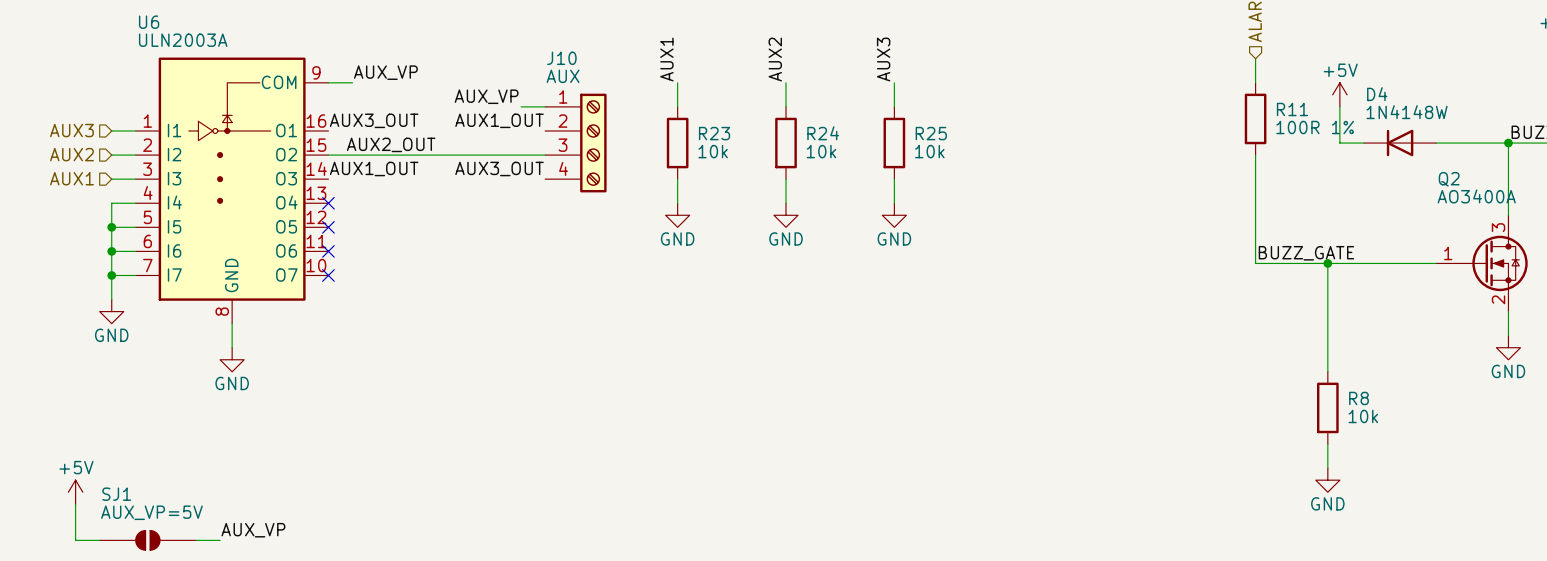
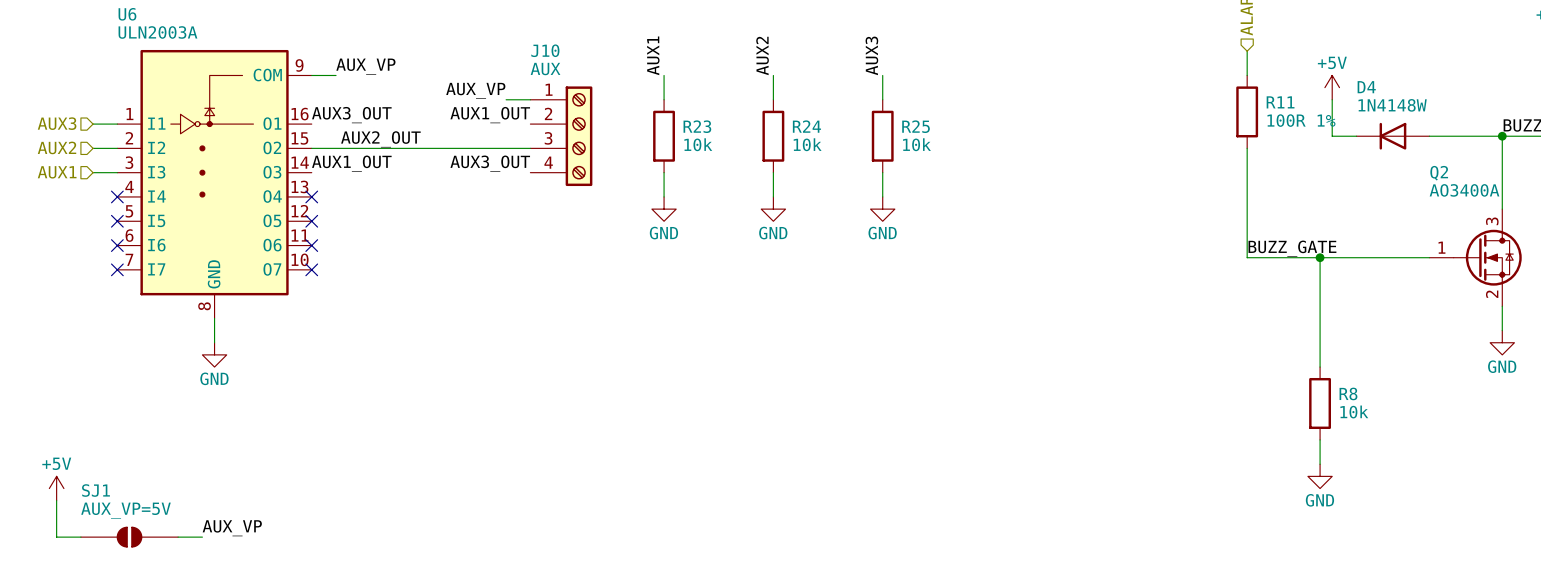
wire: (135, 203) (111, 203) (111, 299) -> none
no-connect mark: none -> (117, 196)
wire: (111, 227) (135, 227) -> none
junction: (111, 227) -> none
no-connect mark: none -> (117, 221)
wire: (111, 251) (135, 251) -> none
junction: (111, 251) -> none
no-connect mark: none -> (117, 245)
wire: (111, 275) (135, 275) -> none
junction: (111, 275) -> none
no-connect mark: none -> (117, 269)
power symbol: GND (111, 311) -> none

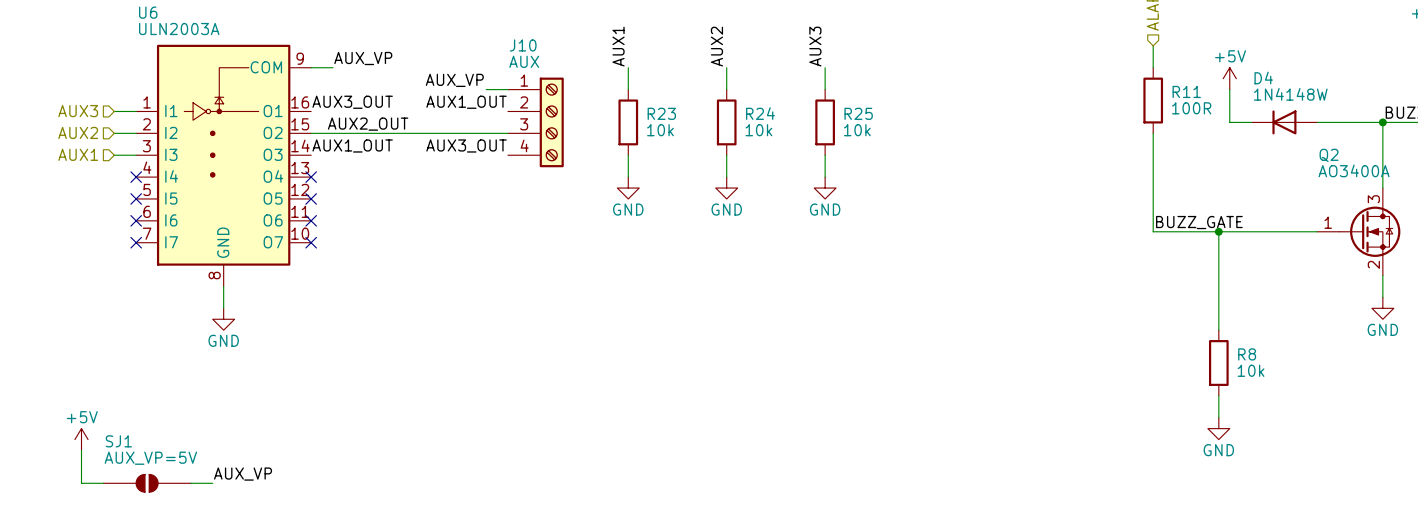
R11 value: 100R 1% (1301, 120) -> 100R (1191, 108)

